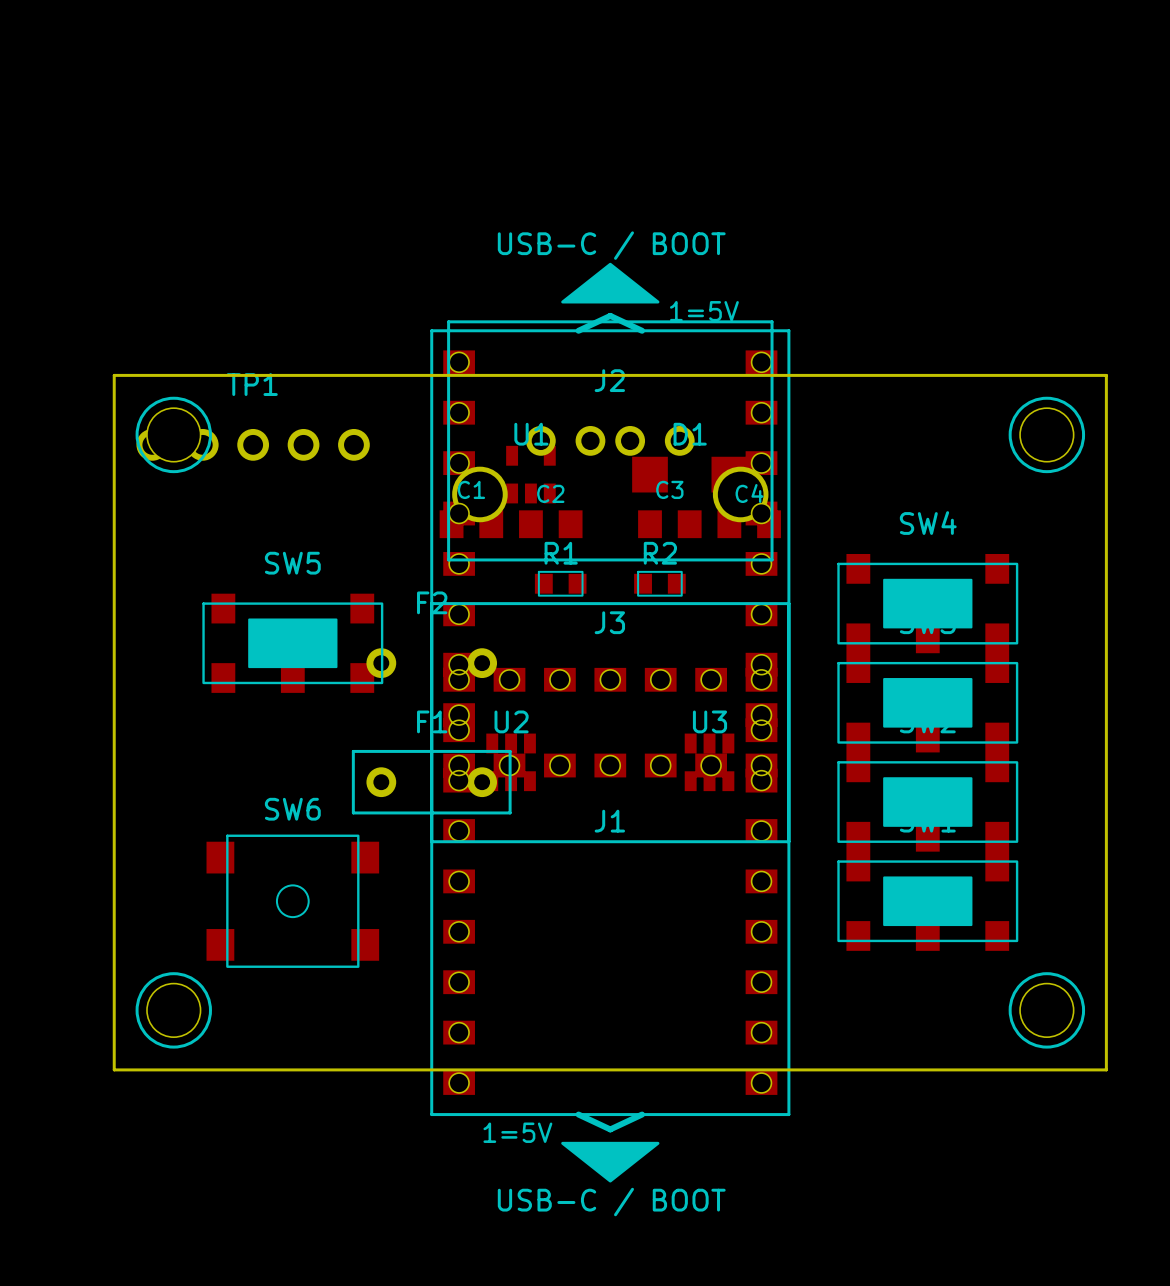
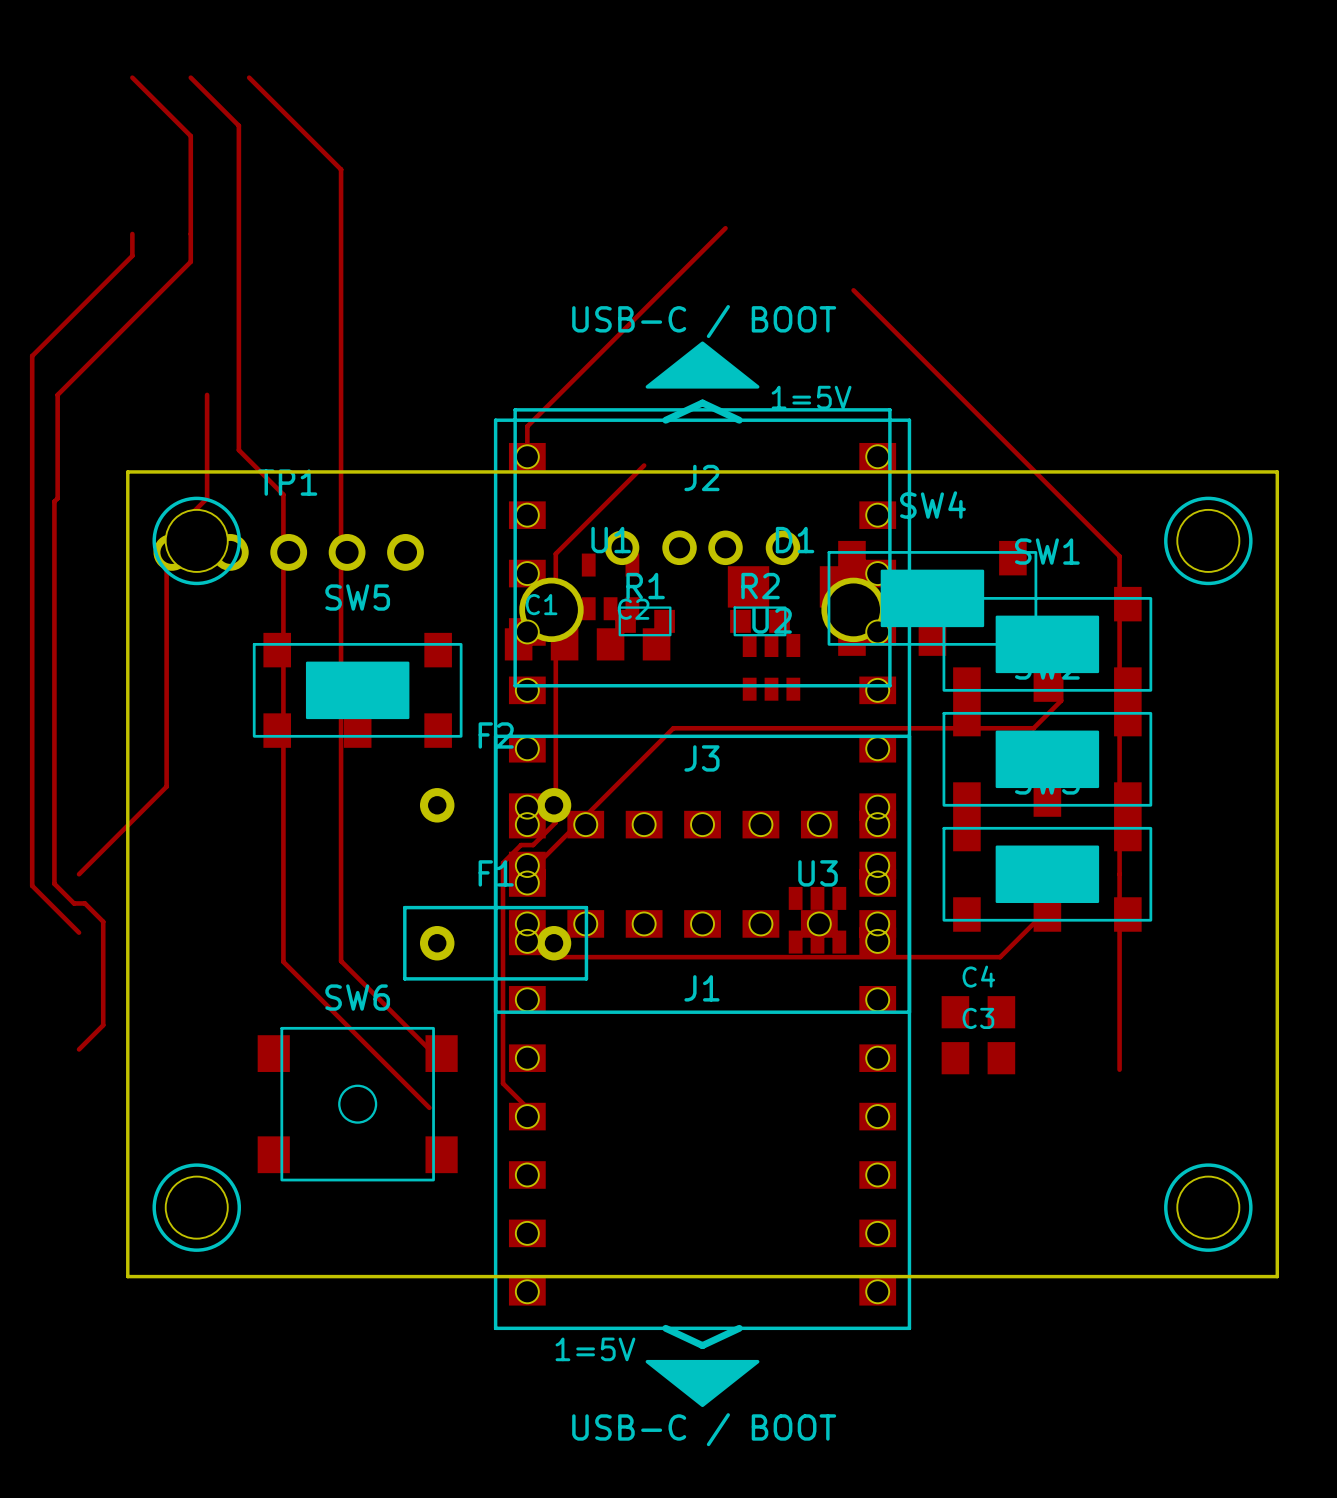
track: none -> (132, 77) (190, 136) (190, 261) (57, 394) (57, 498) (54, 501) (54, 883) (74, 903) (84, 903) (103, 921) (103, 1025) (79, 1049)
track: none -> (190, 77) (238, 125) (238, 450) (283, 494) (283, 961) (429, 1107)
track: none -> (249, 77) (341, 169) (341, 961) (429, 1049)
track: none -> (725, 228) (527, 426) (527, 465)
track: none -> (132, 233) (132, 255) (32, 356) (32, 885) (79, 932)
track: none -> (853, 290) (1119, 556) (1119, 1069)
track: none -> (207, 394) (207, 498) (166, 538) (166, 786) (79, 874)
track: none -> (644, 465) (555, 553) (555, 822) (533, 845) (521, 845) (503, 863) (503, 1083) (527, 1107)
C3 position: (669, 524) -> (978, 1058)
C4 position: (749, 524) -> (978, 1012)
track: none -> (1061, 678) (1061, 700) (1033, 728) (673, 728) (527, 874)
R1 position: (560, 583) -> (645, 621)
R2 position: (659, 583) -> (760, 621)
SW4 position: (927, 603) -> (932, 598)
SW5 position: (292, 643) -> (357, 690)
part position: (927, 702) -> (1047, 874)
track: none -> (1061, 874) (1061, 896) (1000, 957) (551, 957) (527, 932)
U2 position: (511, 762) -> (771, 667)
part position: (927, 802) -> (1047, 759)
SW6 position: (292, 901) -> (357, 1104)
SW1 position: (927, 901) -> (1047, 644)

